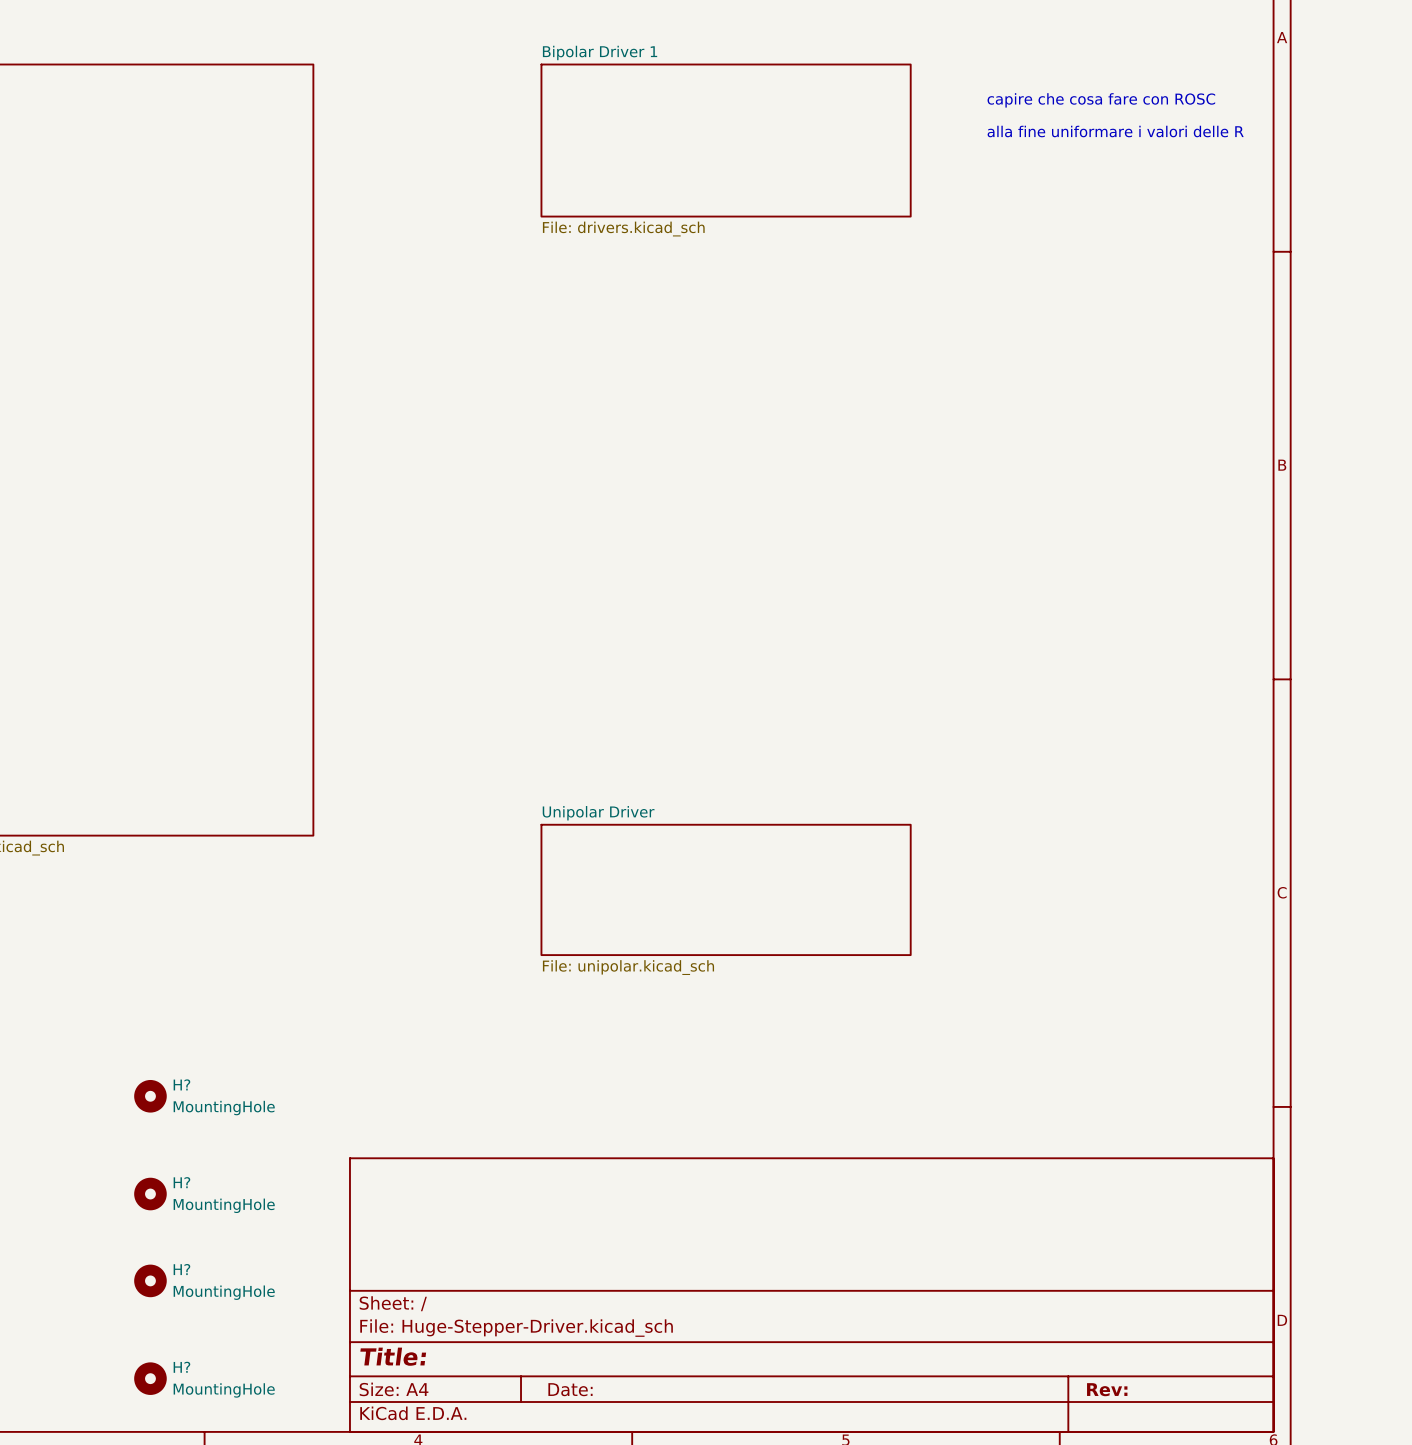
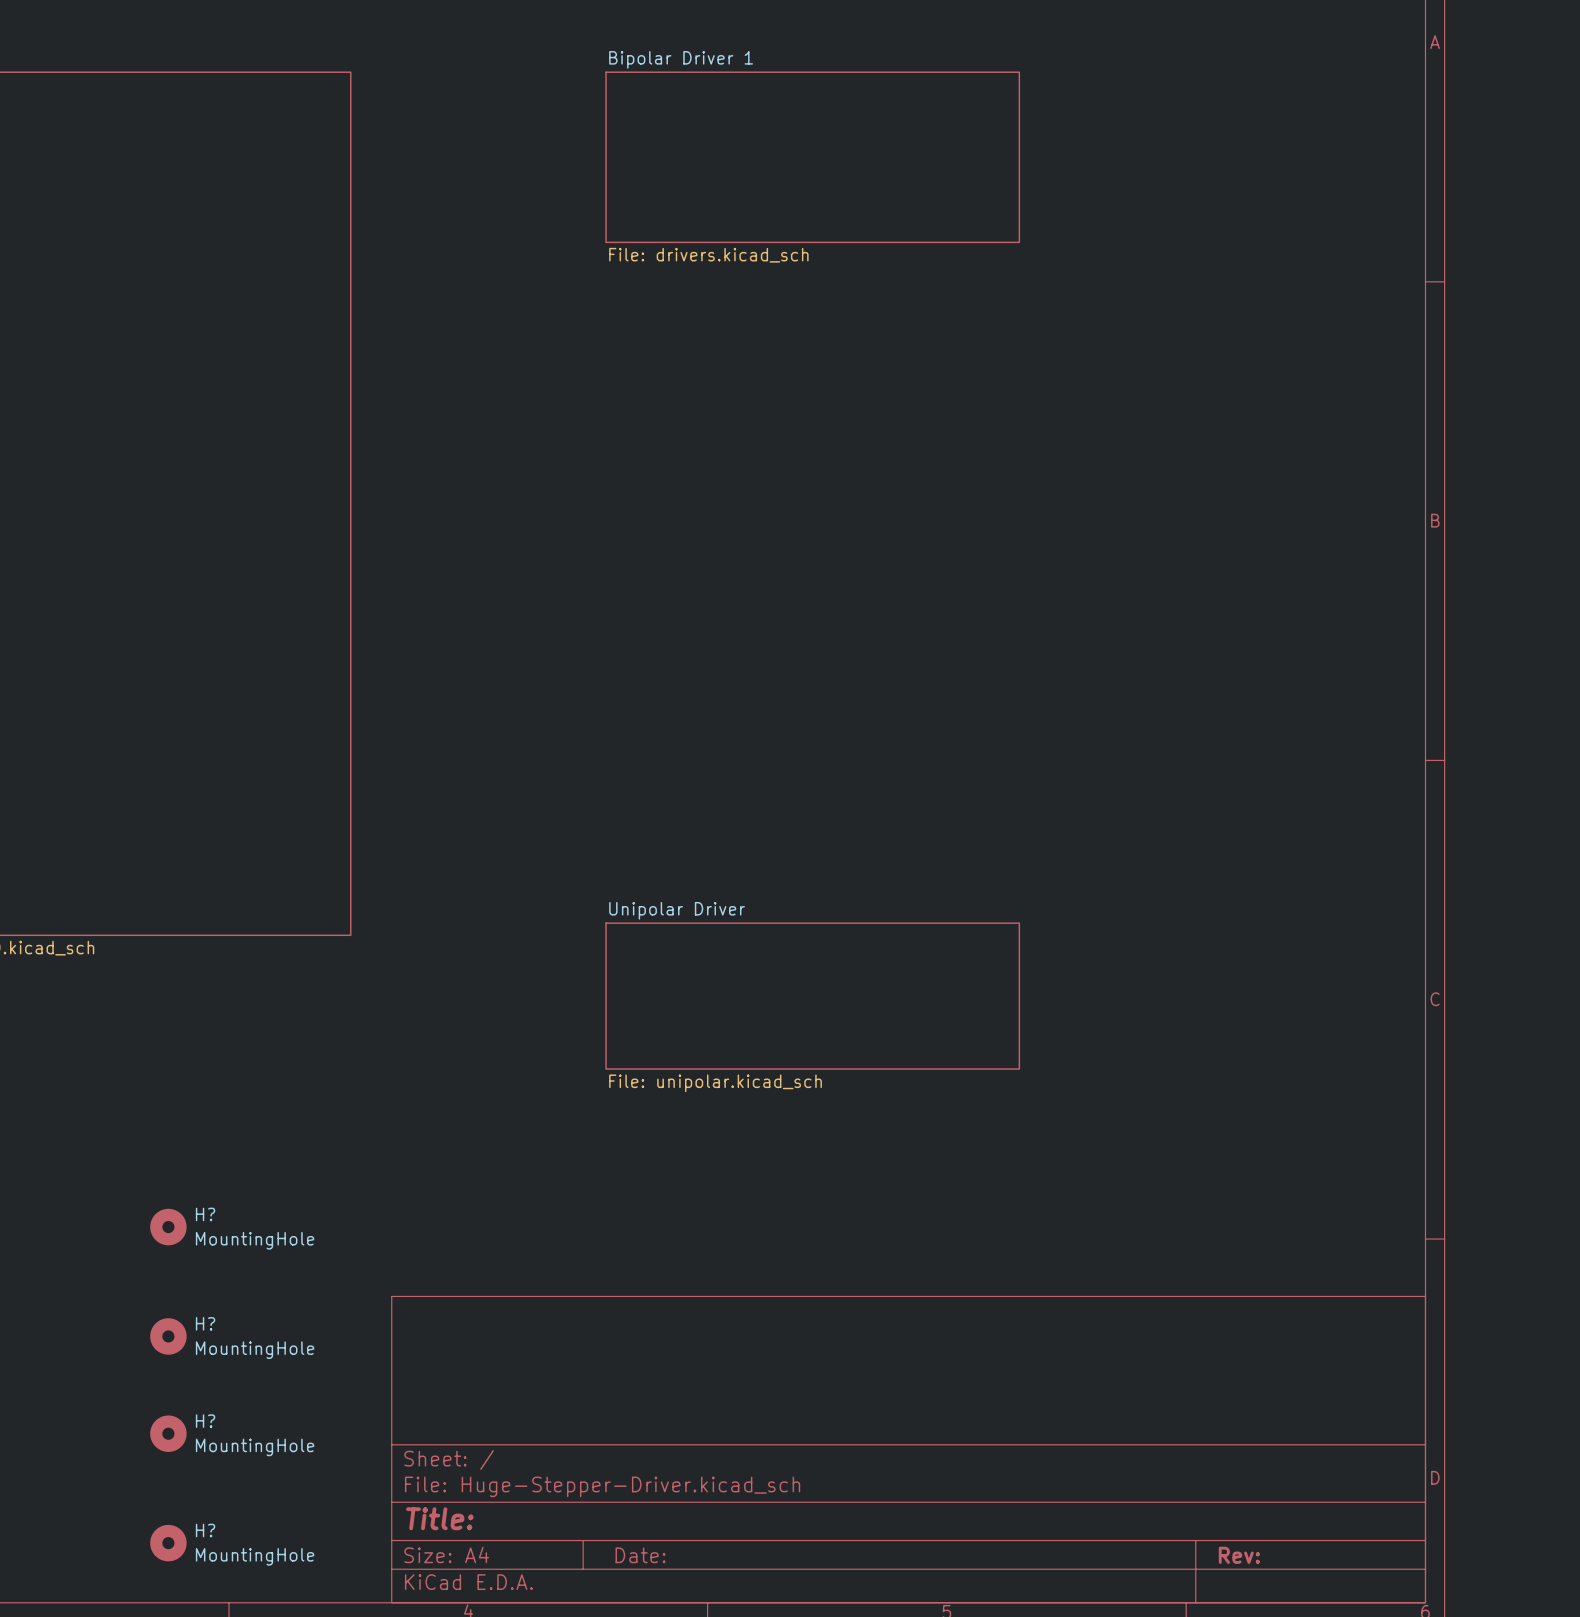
text: capire che cosa fare con ROSC (1101, 100) -> none
text: alla fine uniformare i valori delle R (1115, 131) -> none

